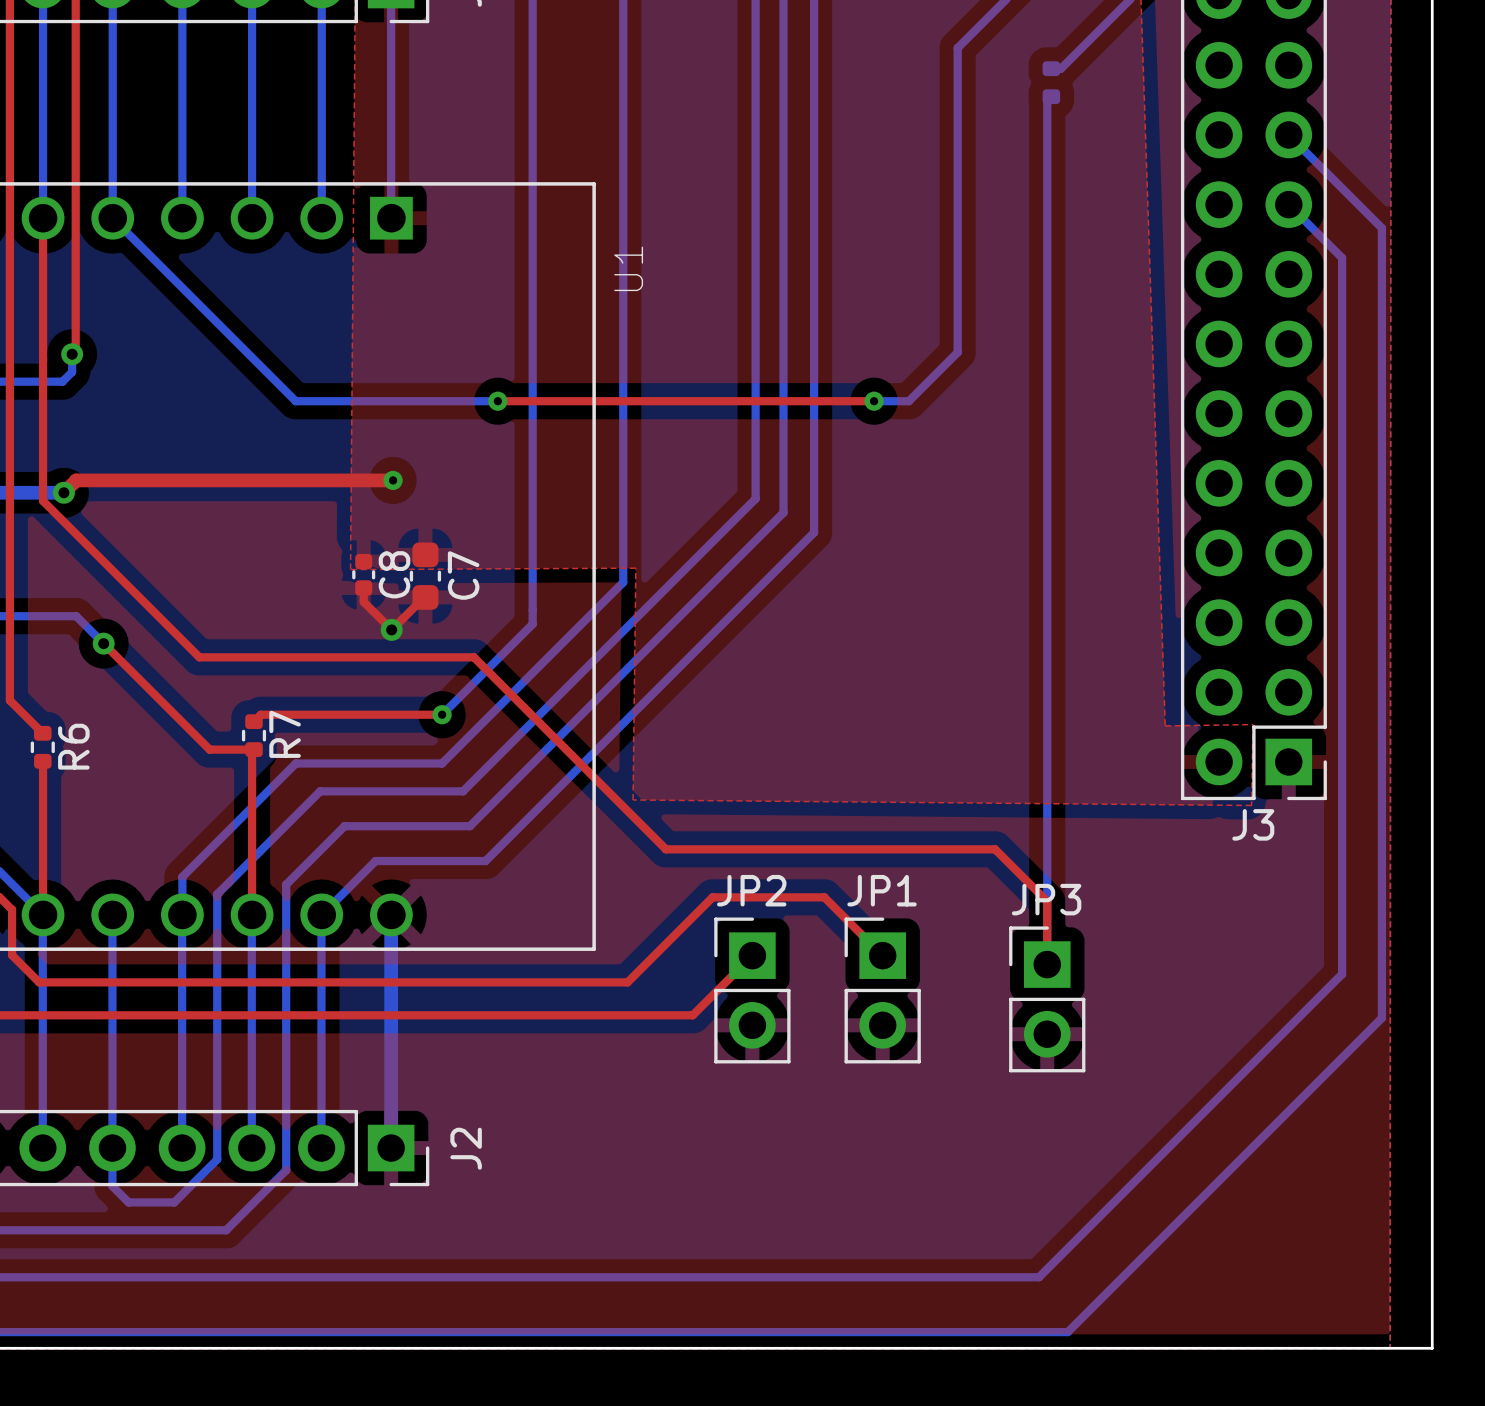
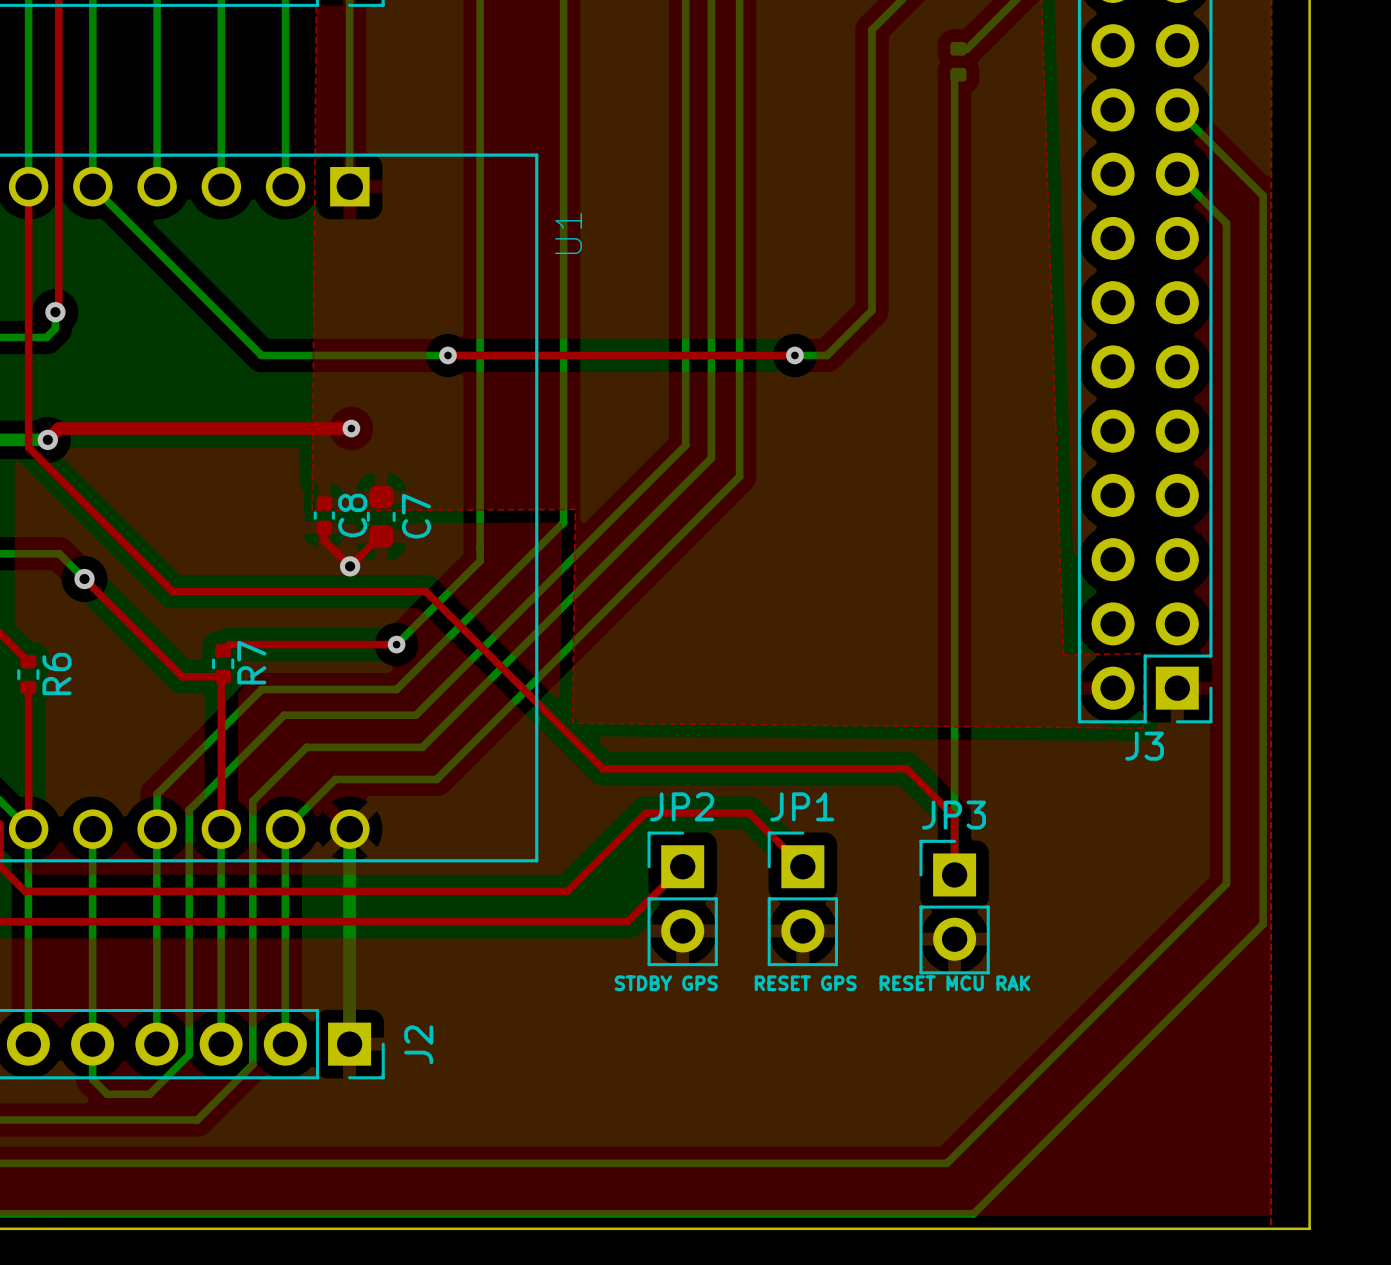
text: none -> STDBY GPS (666, 983)
text: none -> RESET GPS (805, 983)
text: none -> RESET MCU RAK (954, 983)

